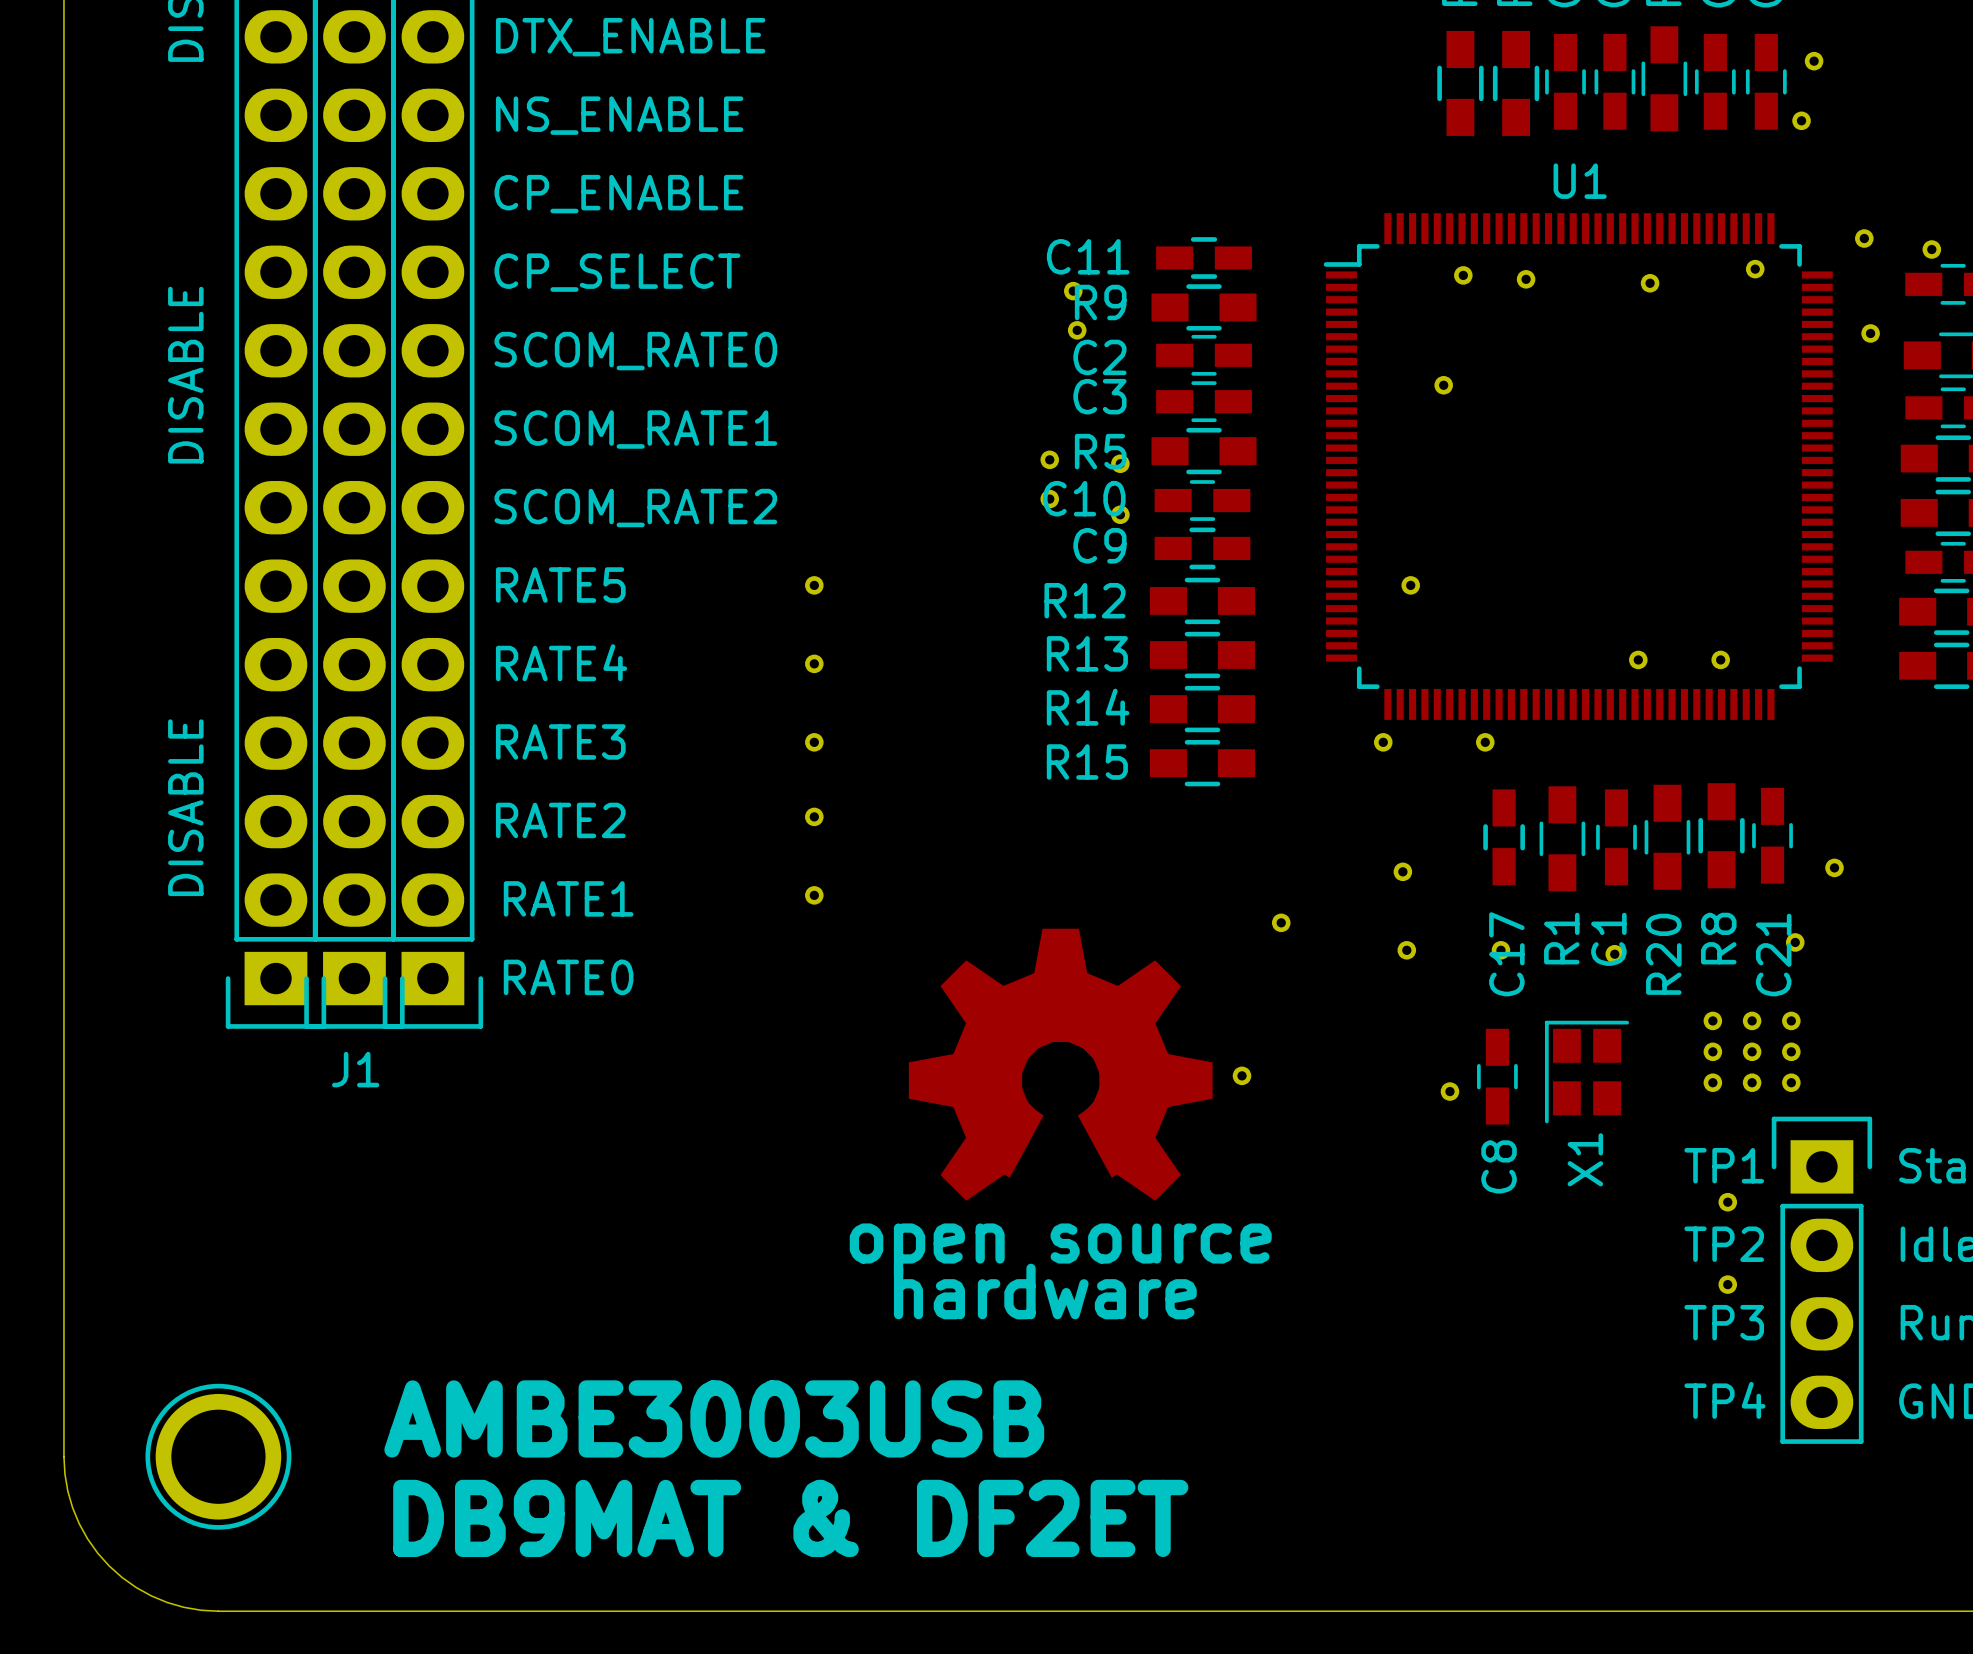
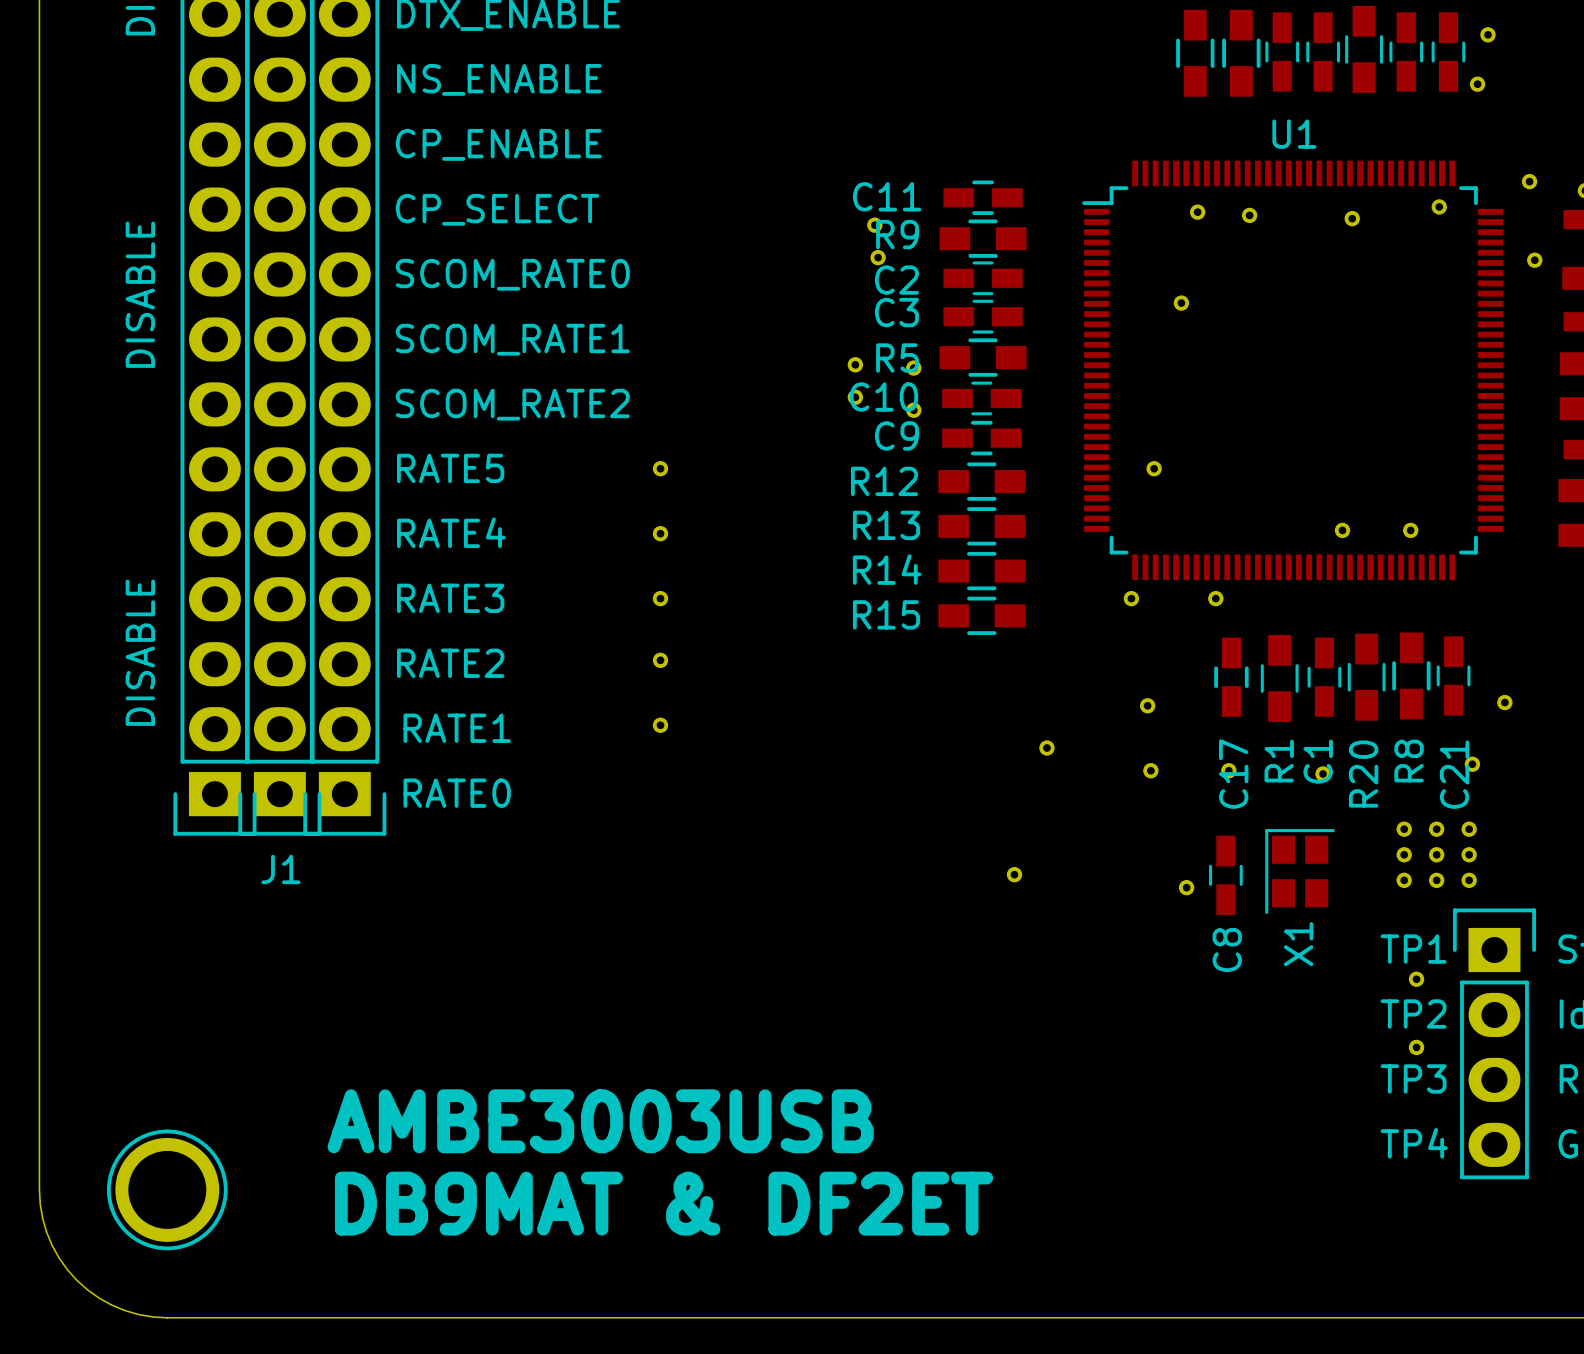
part: (1060, 1064) -> none
text: open source (1060, 1251) -> none
text: hardware (1045, 1291) -> none
text position: AMBE3003USB (714, 1418) -> AMBE3003USB (600, 1121)
text position: DB9MAT & DF2ET (790, 1518) -> DB9MAT & DF2ET (664, 1203)

